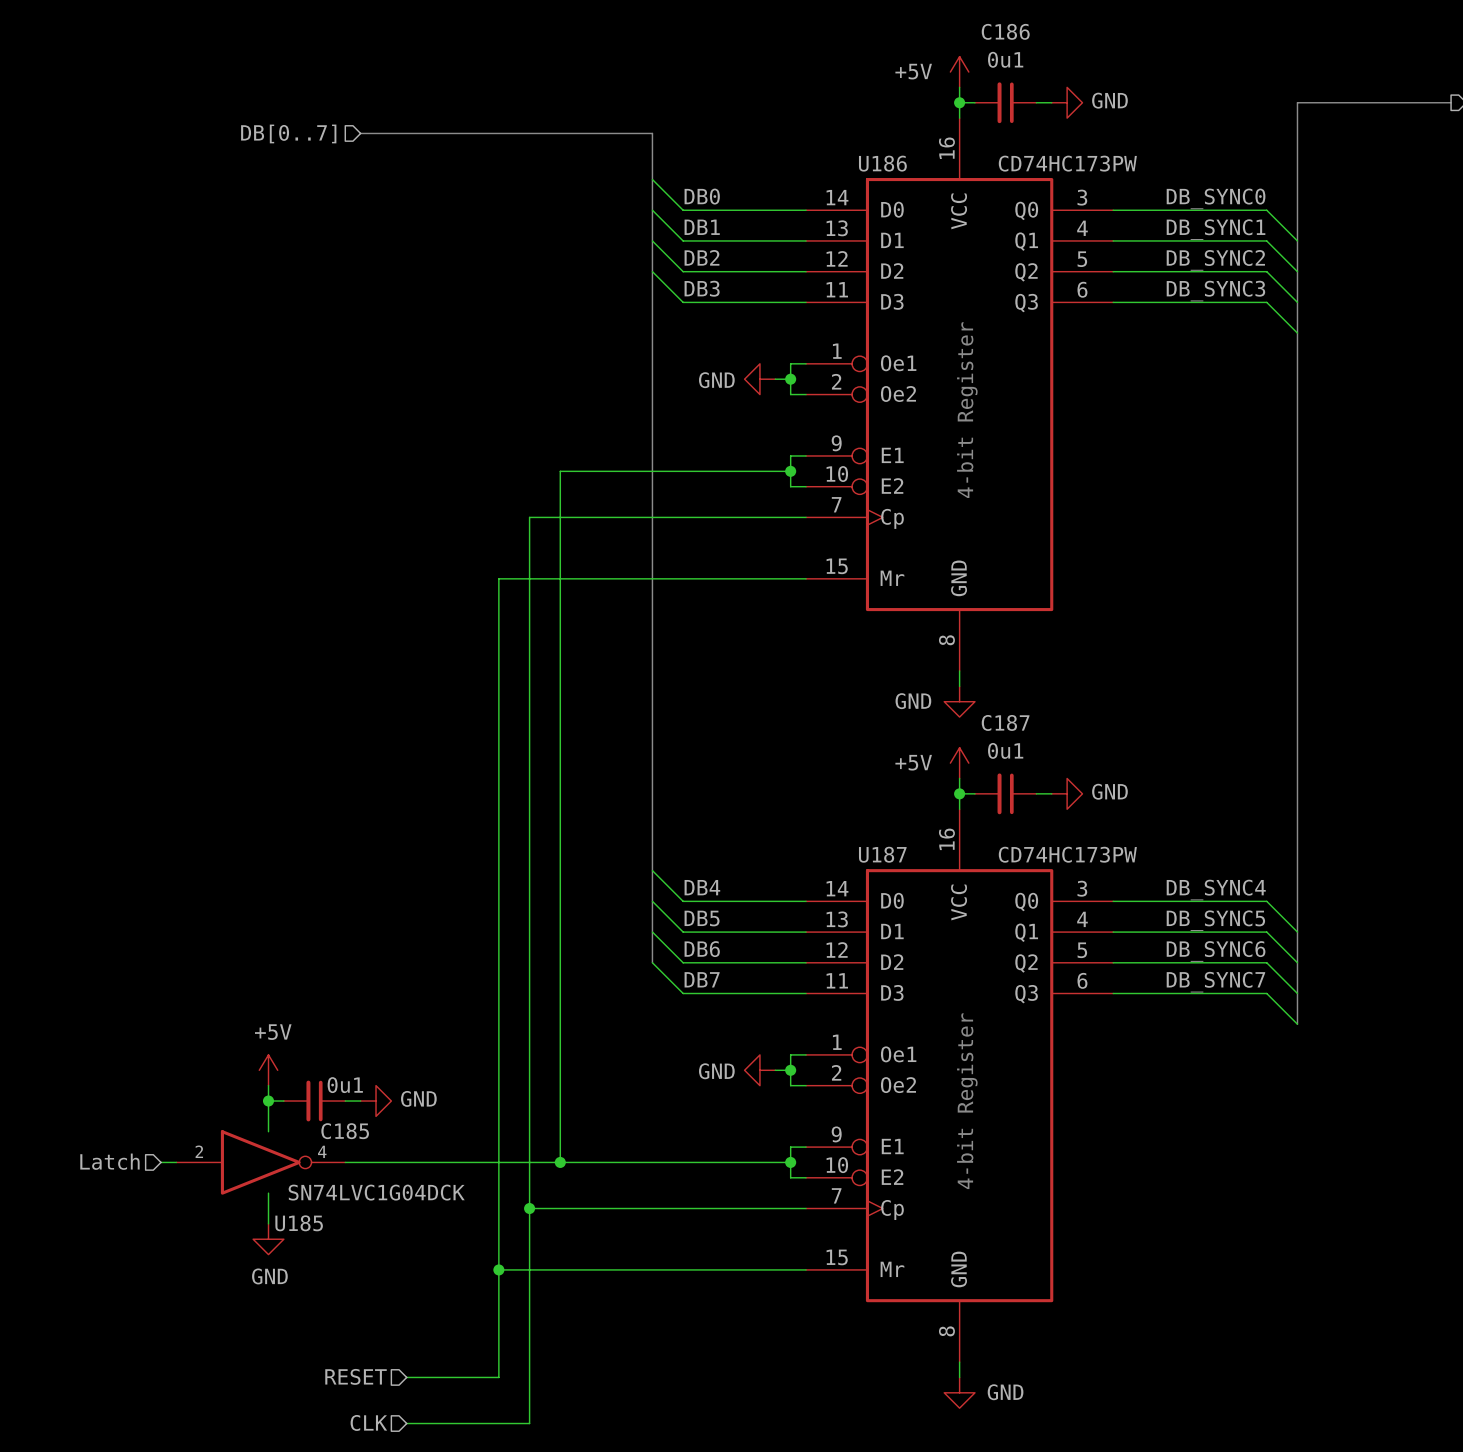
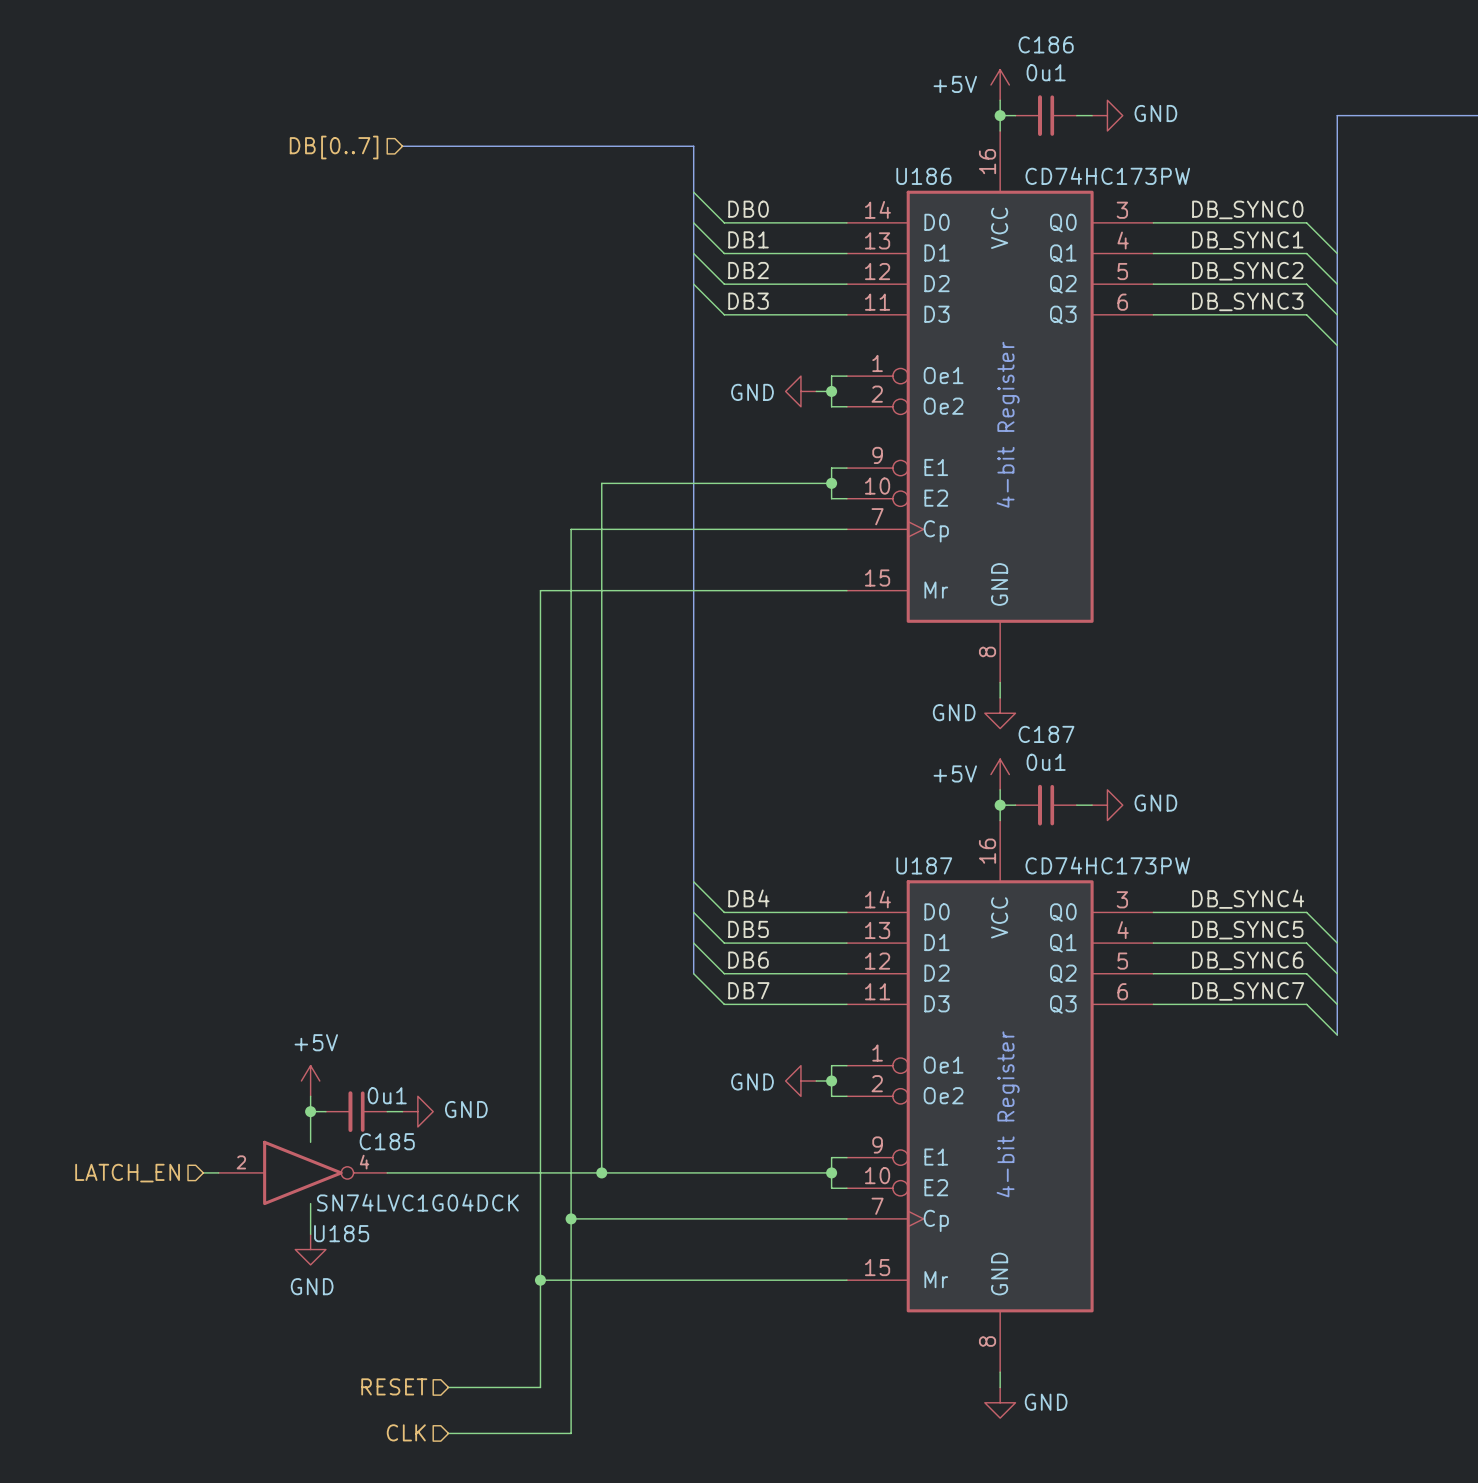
hierarchical label: Latch (109, 1161) -> LATCH_EN (127, 1173)

